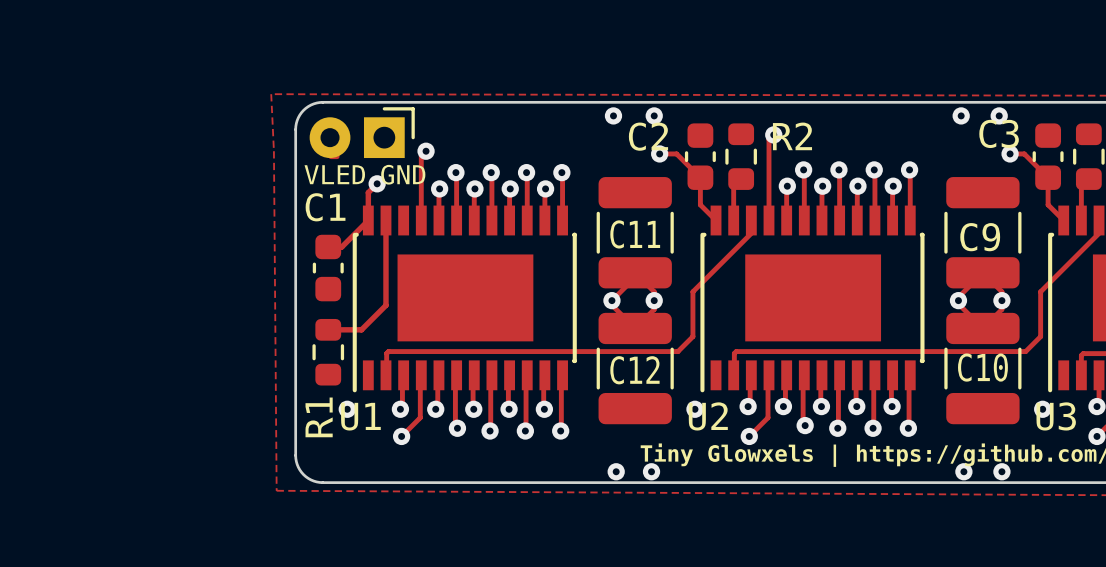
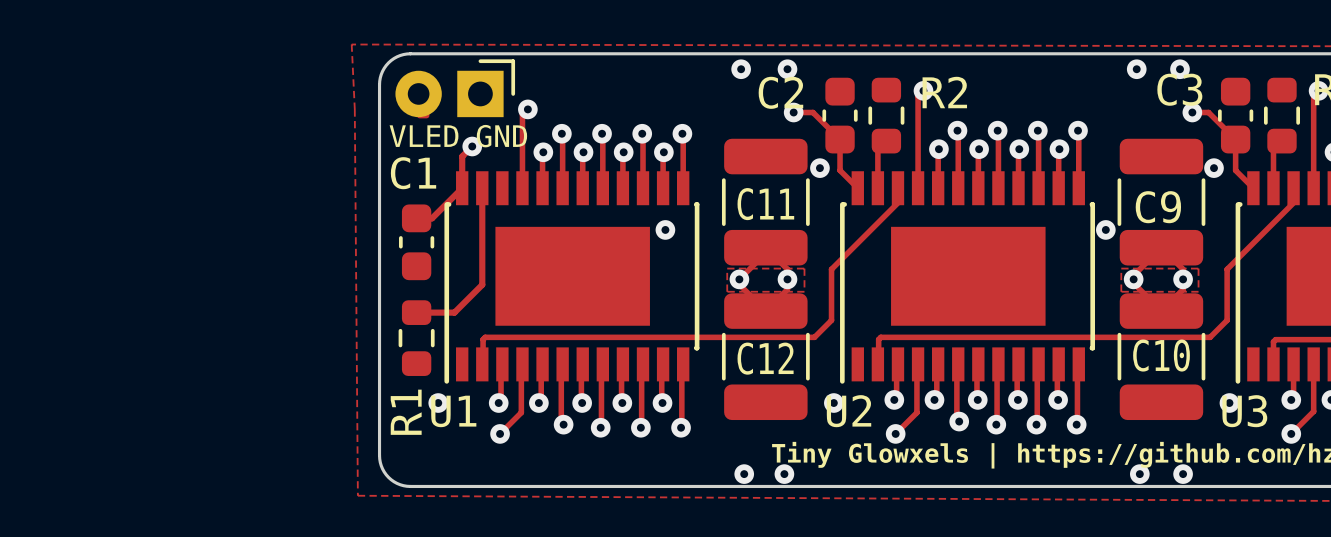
via: none -> (819, 168)
via: none -> (1214, 168)
via: none -> (665, 229)
via: none -> (1105, 229)
zone outline: none -> (727, 268) (804, 268) (804, 291) (727, 291) (727, 268)
zone outline: none -> (1121, 268) (1198, 268) (1198, 291) (1121, 291) (1121, 268)

